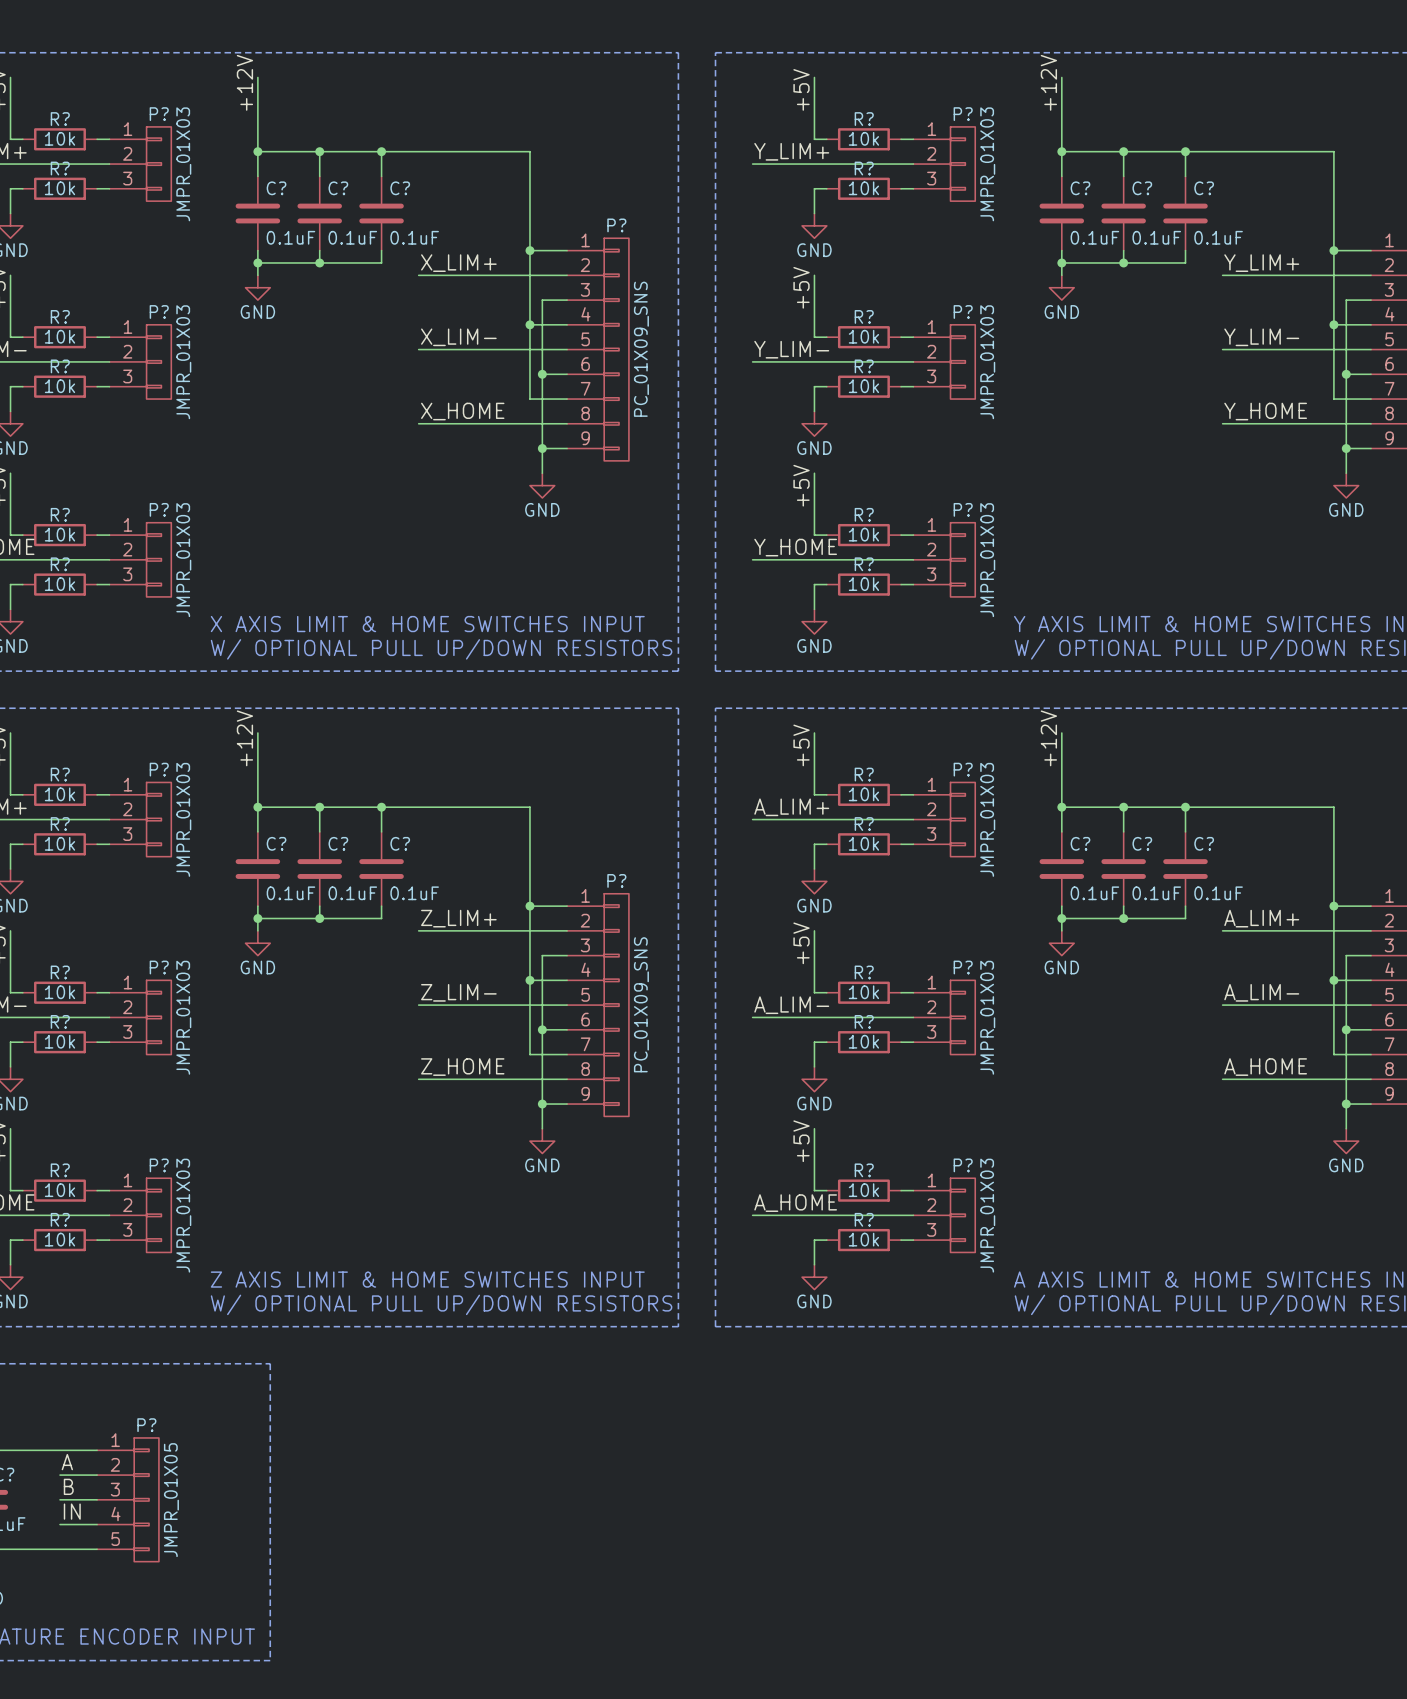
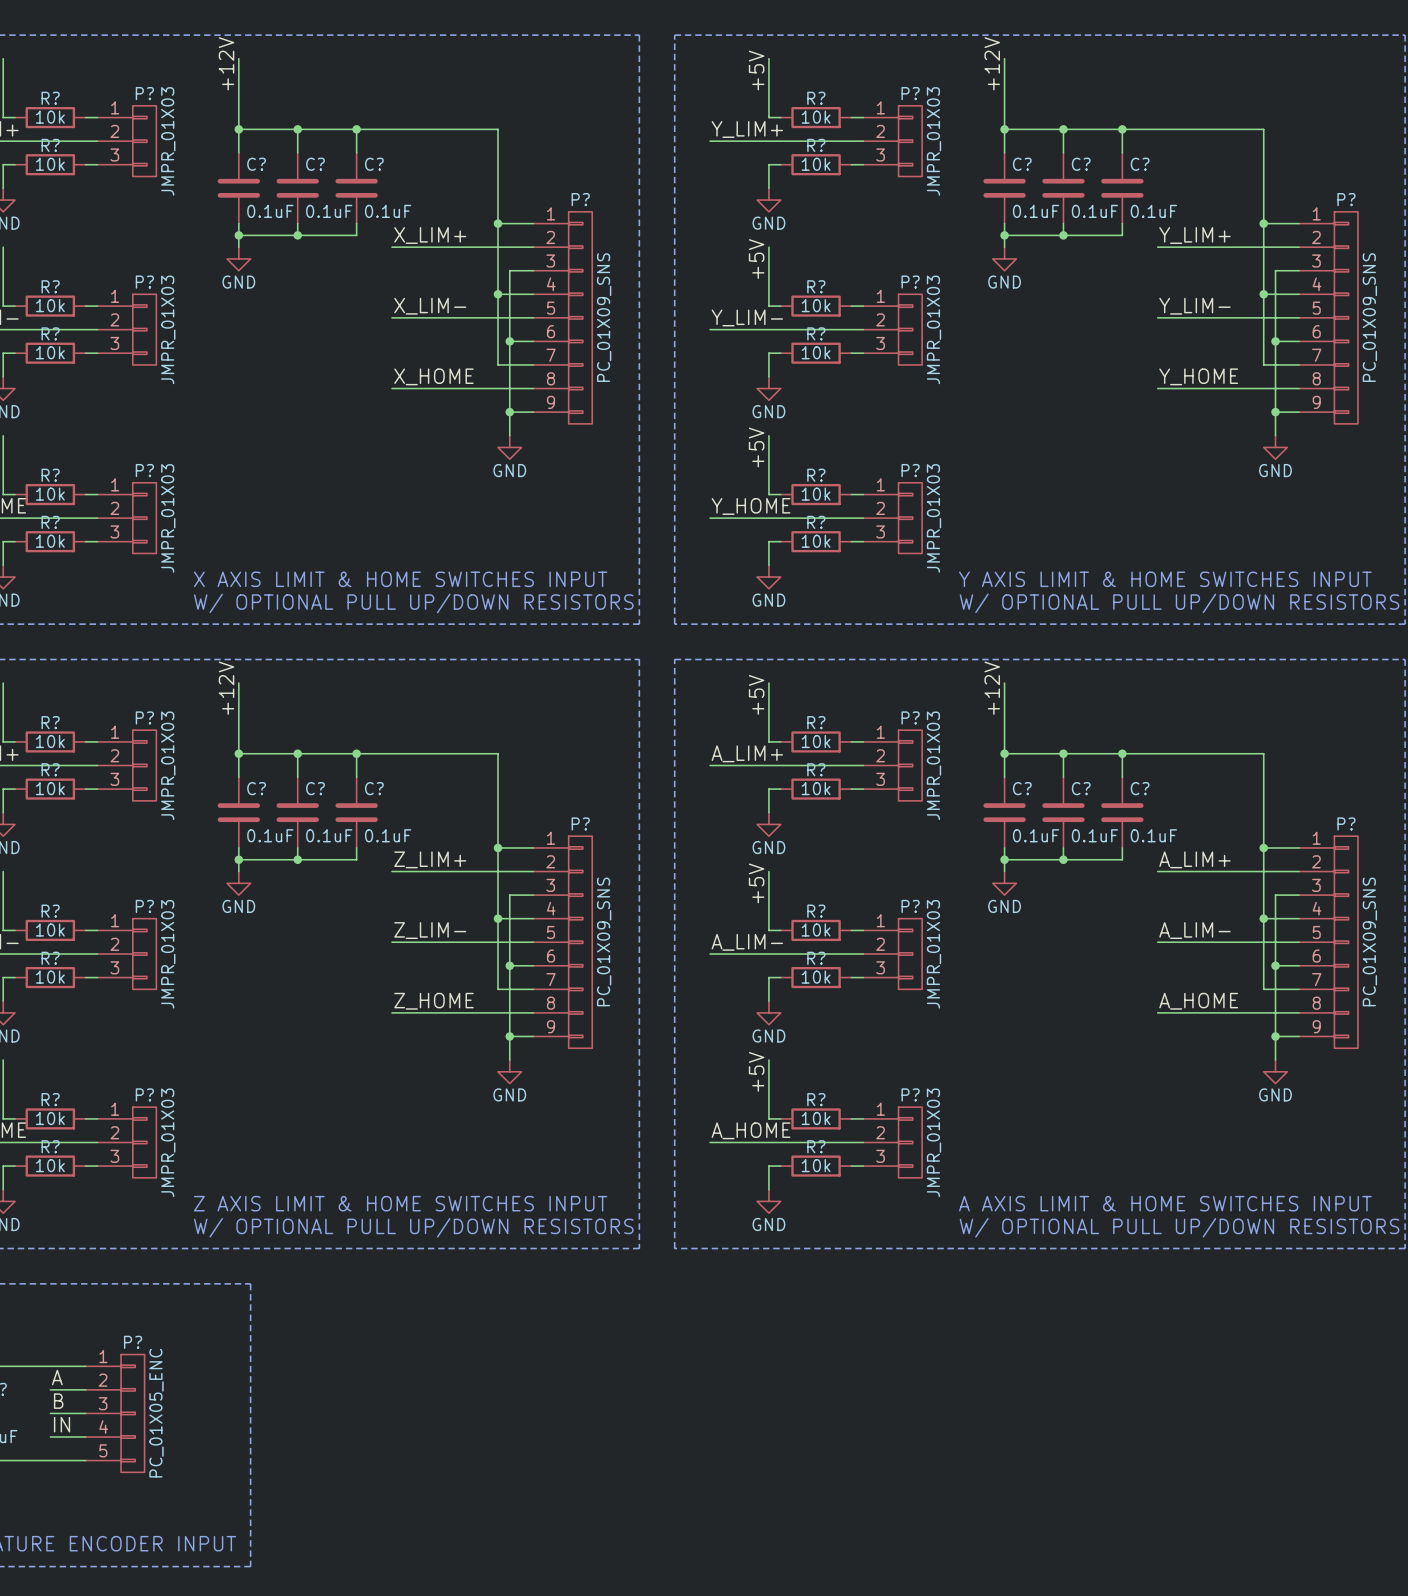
P? value: JMPR_01X05 (171, 1500) -> PC_01X05_ENC (156, 1413)

